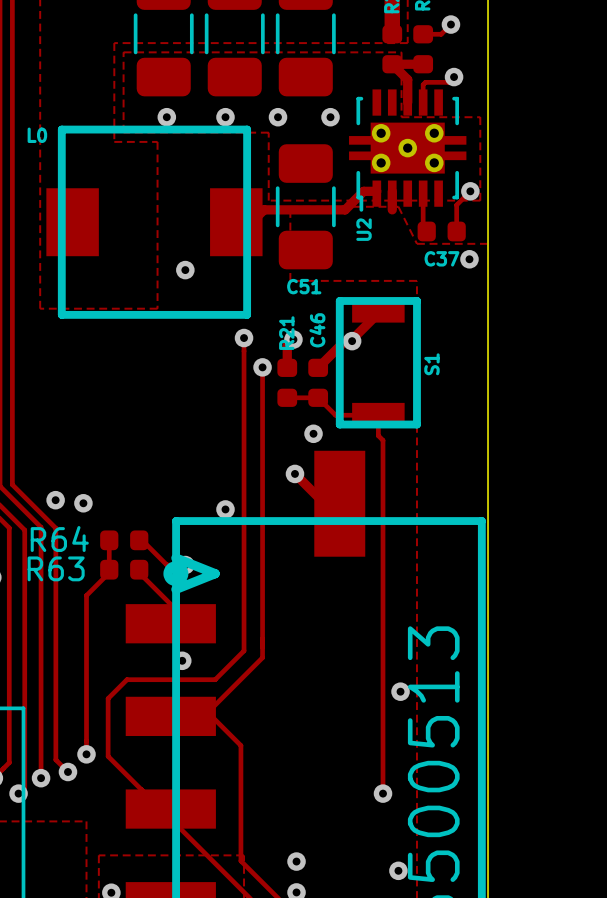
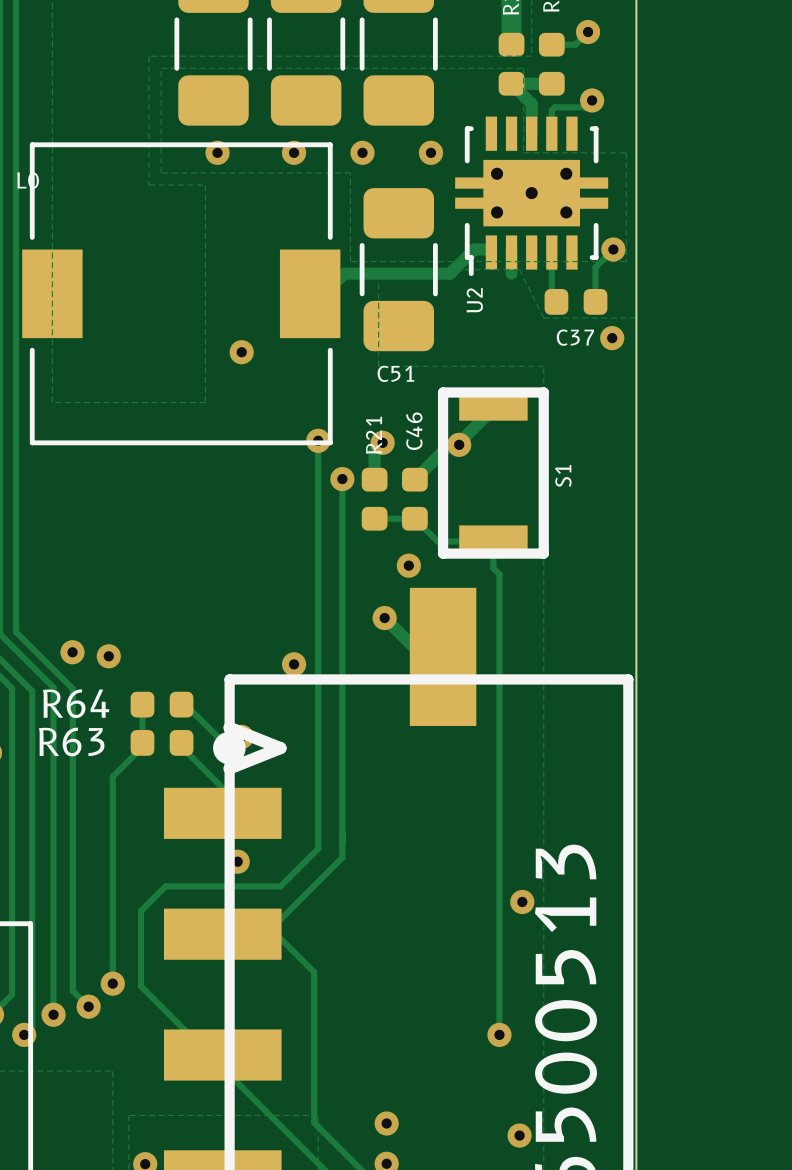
L0 footprint: [46, 125, 263, 319] -> [22, 142, 341, 446]

